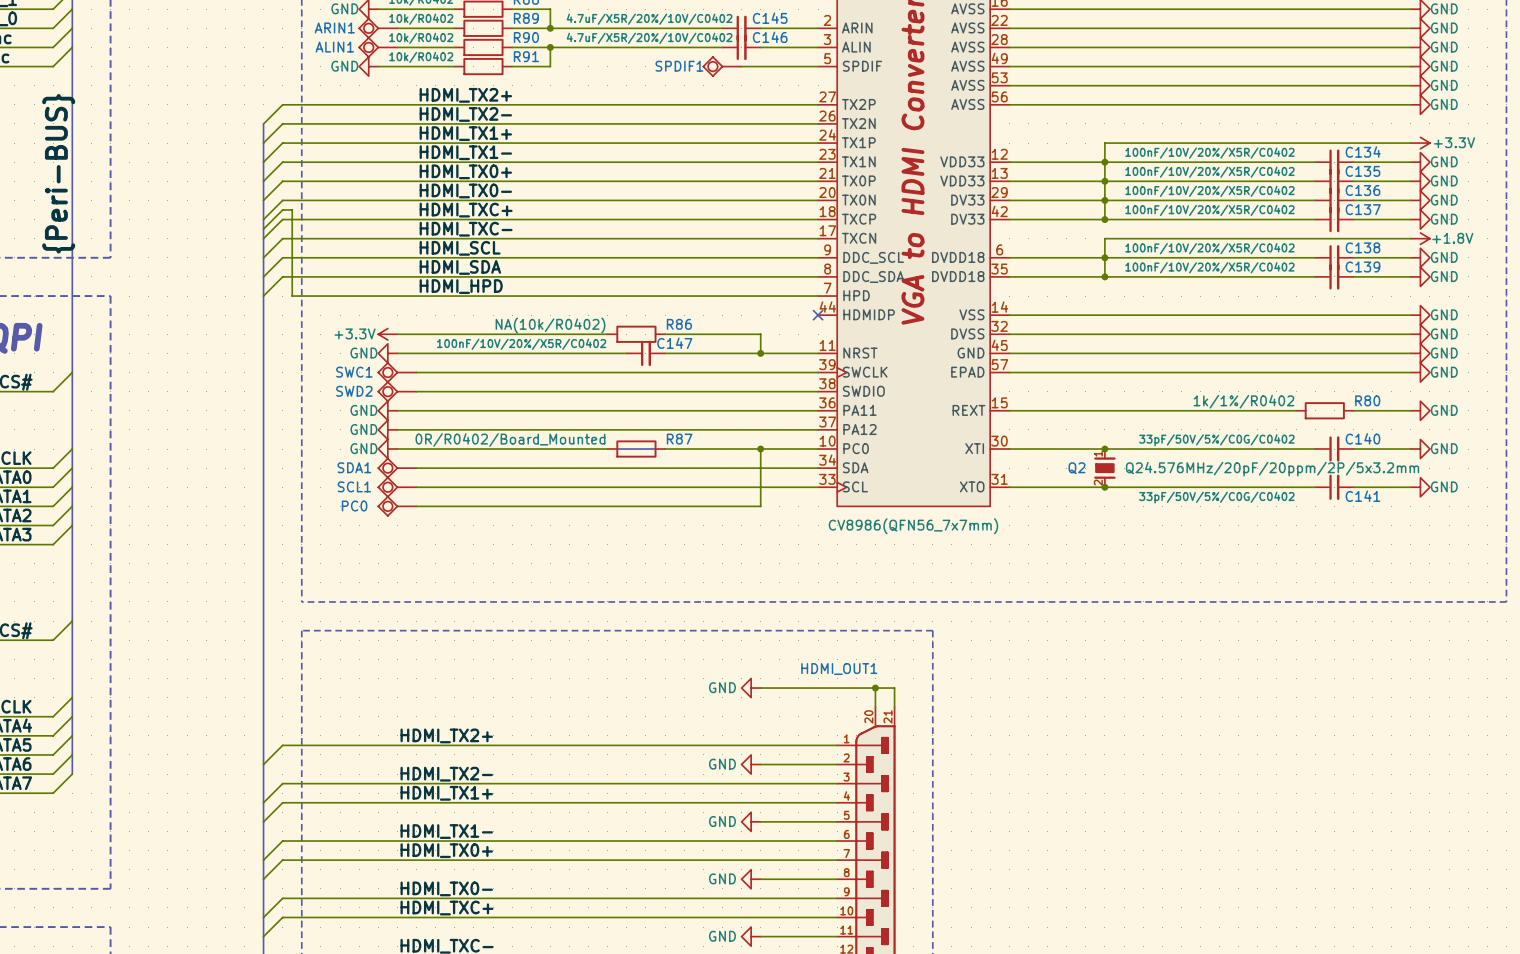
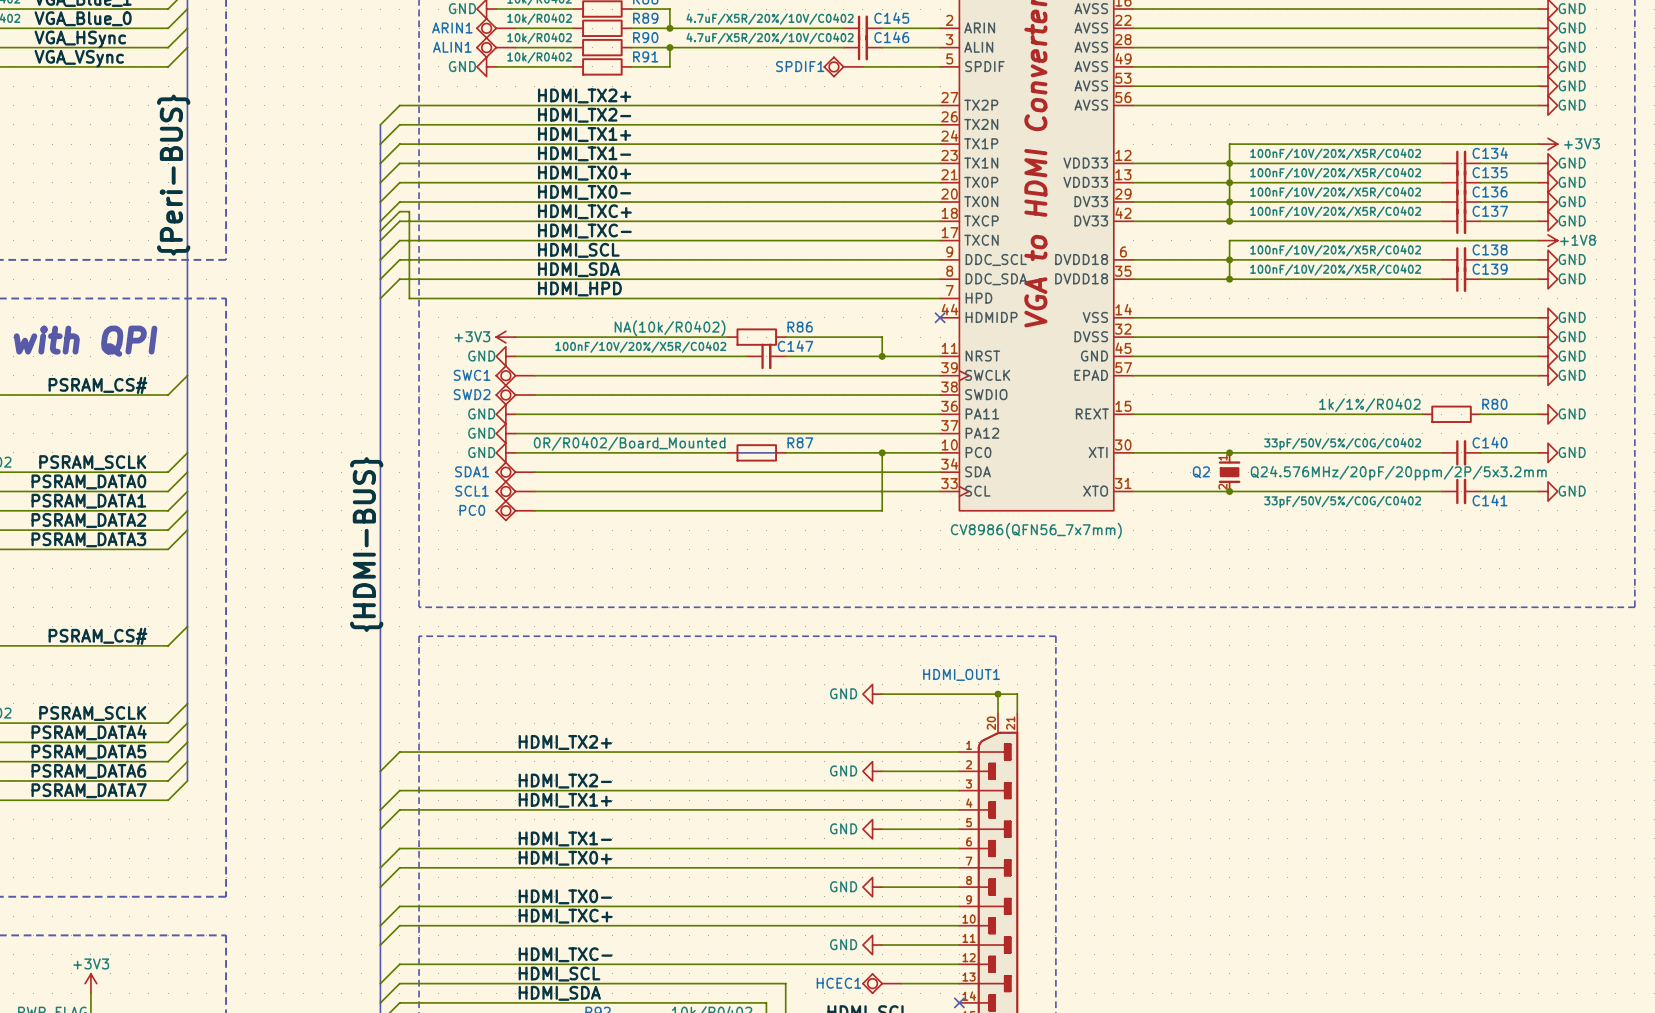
power symbol: +3.3V (1420, 143) -> +3V3 (1548, 144)
power symbol: +1.8V (1420, 238) -> +1V8 (1548, 240)
power symbol: +3.3V (387, 334) -> +3V3 (505, 337)
label: none -> {HDMI-BUS} (366, 544)

